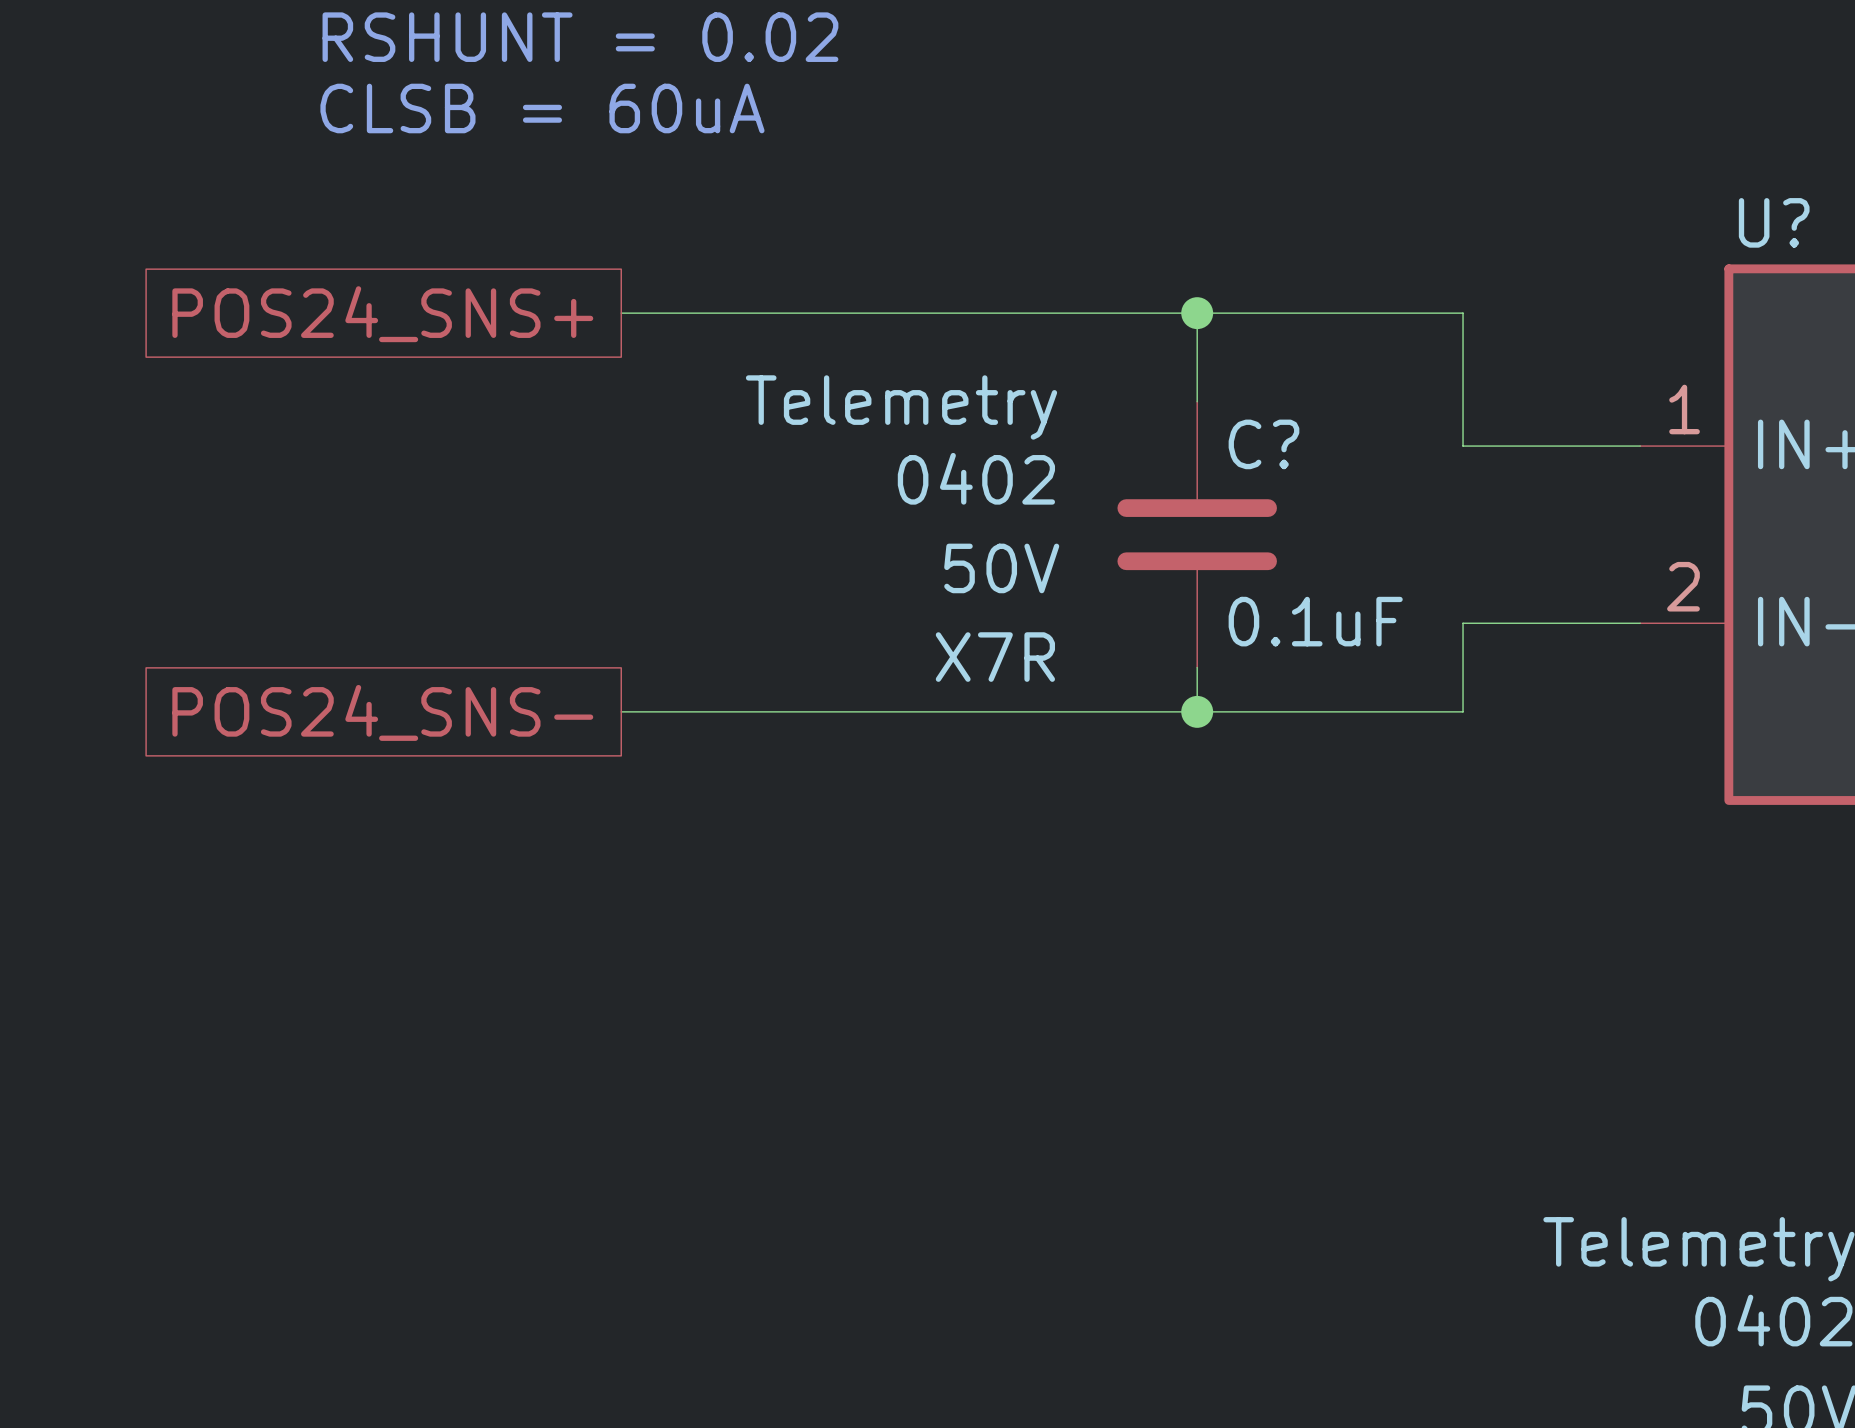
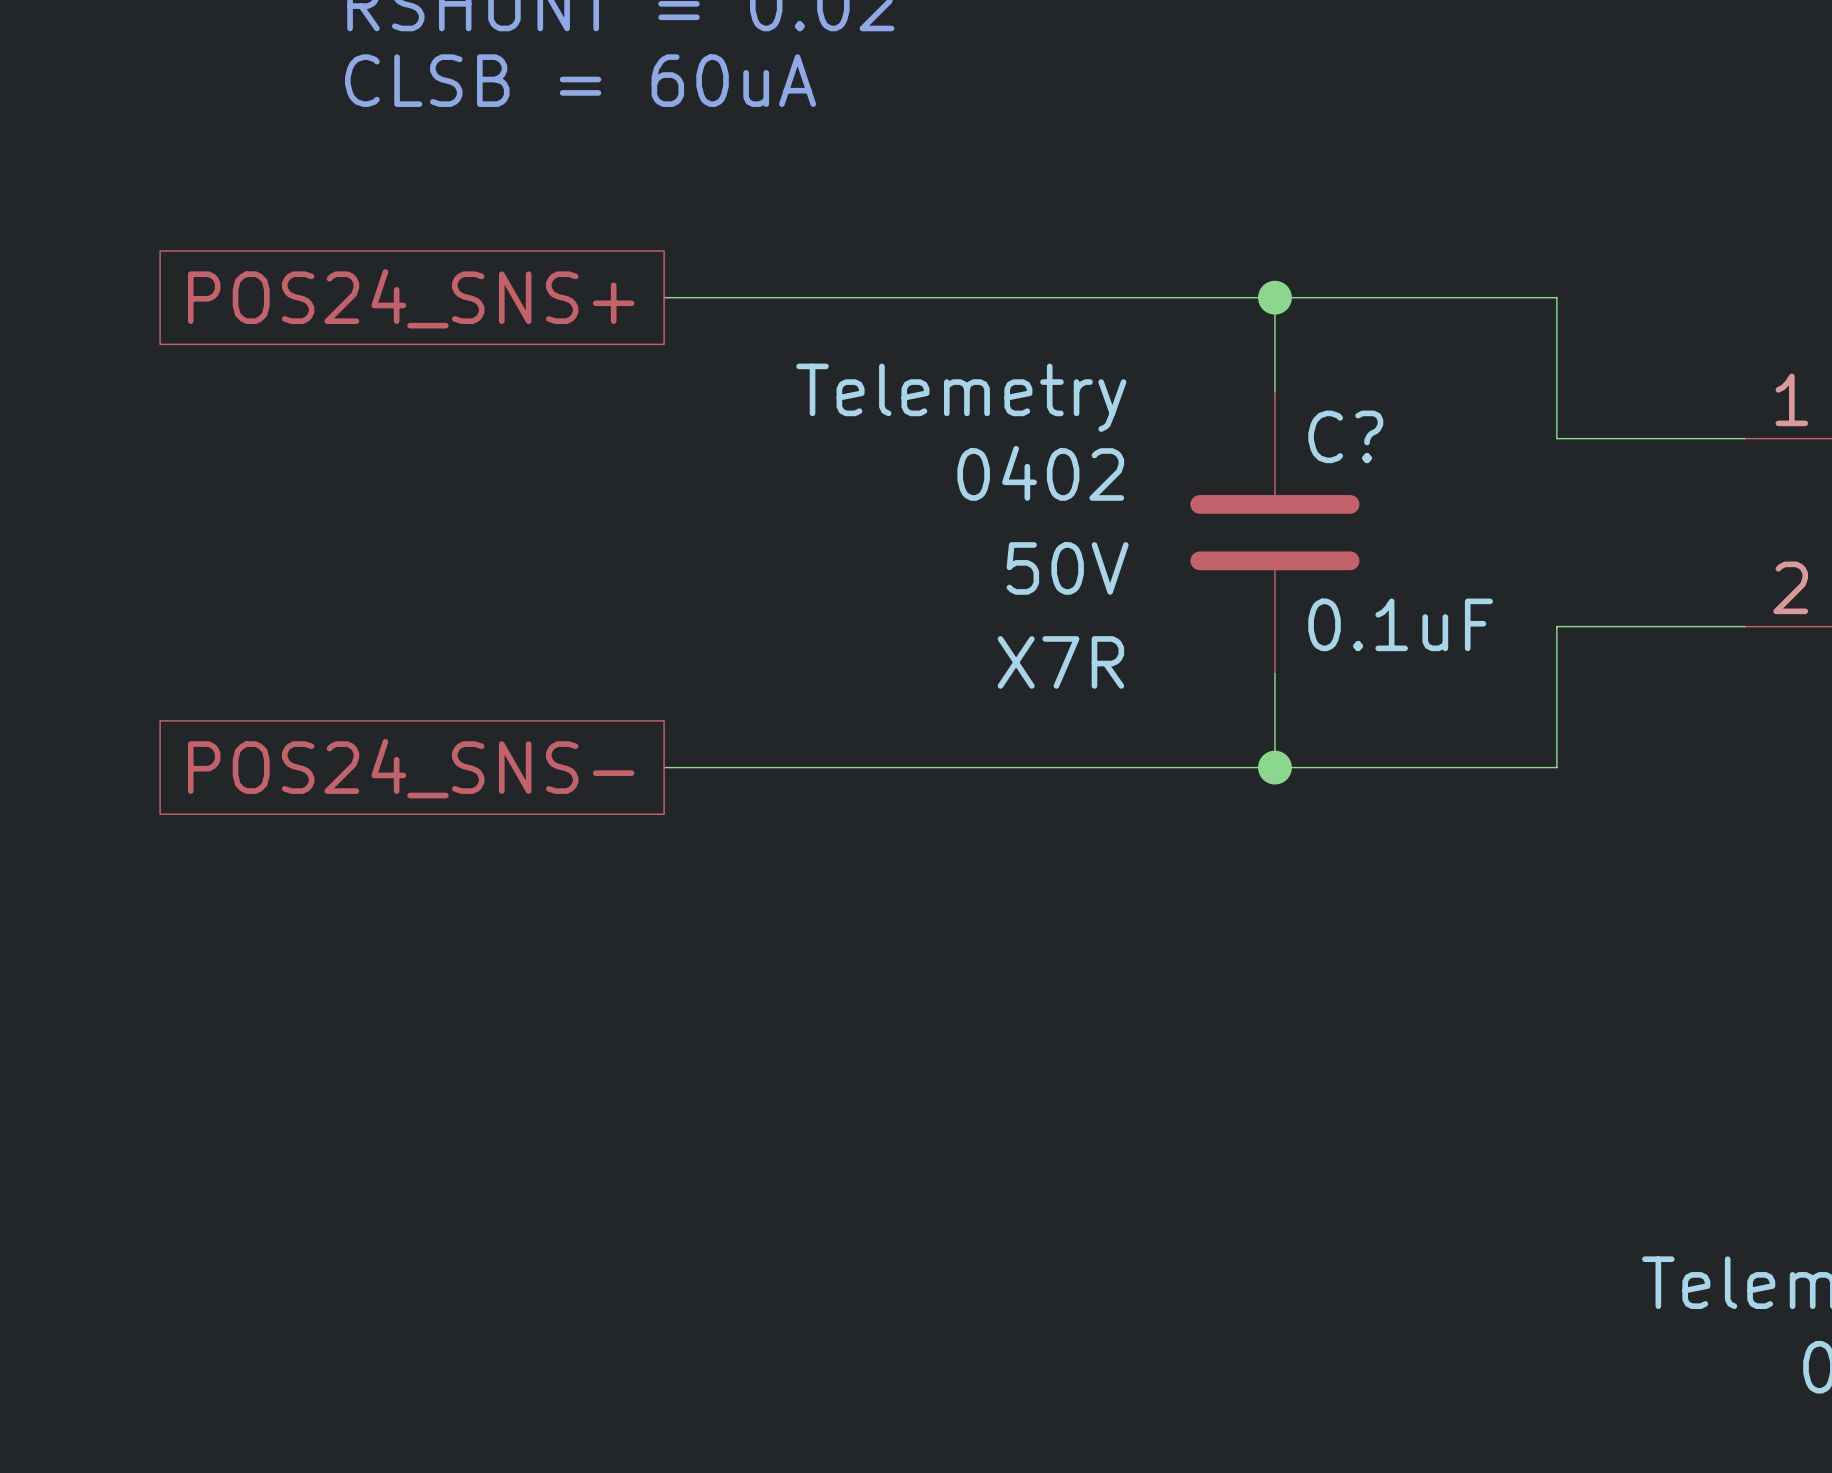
wire: (621, 711) (1463, 711) -> (664, 767) (1556, 767) (1556, 720)
wire: none -> (1274, 720) (1274, 767)
junction position: (1197, 711) -> (1274, 767)
global label position: POS24_SNS- (382, 712) -> POS24_SNS- (411, 768)

